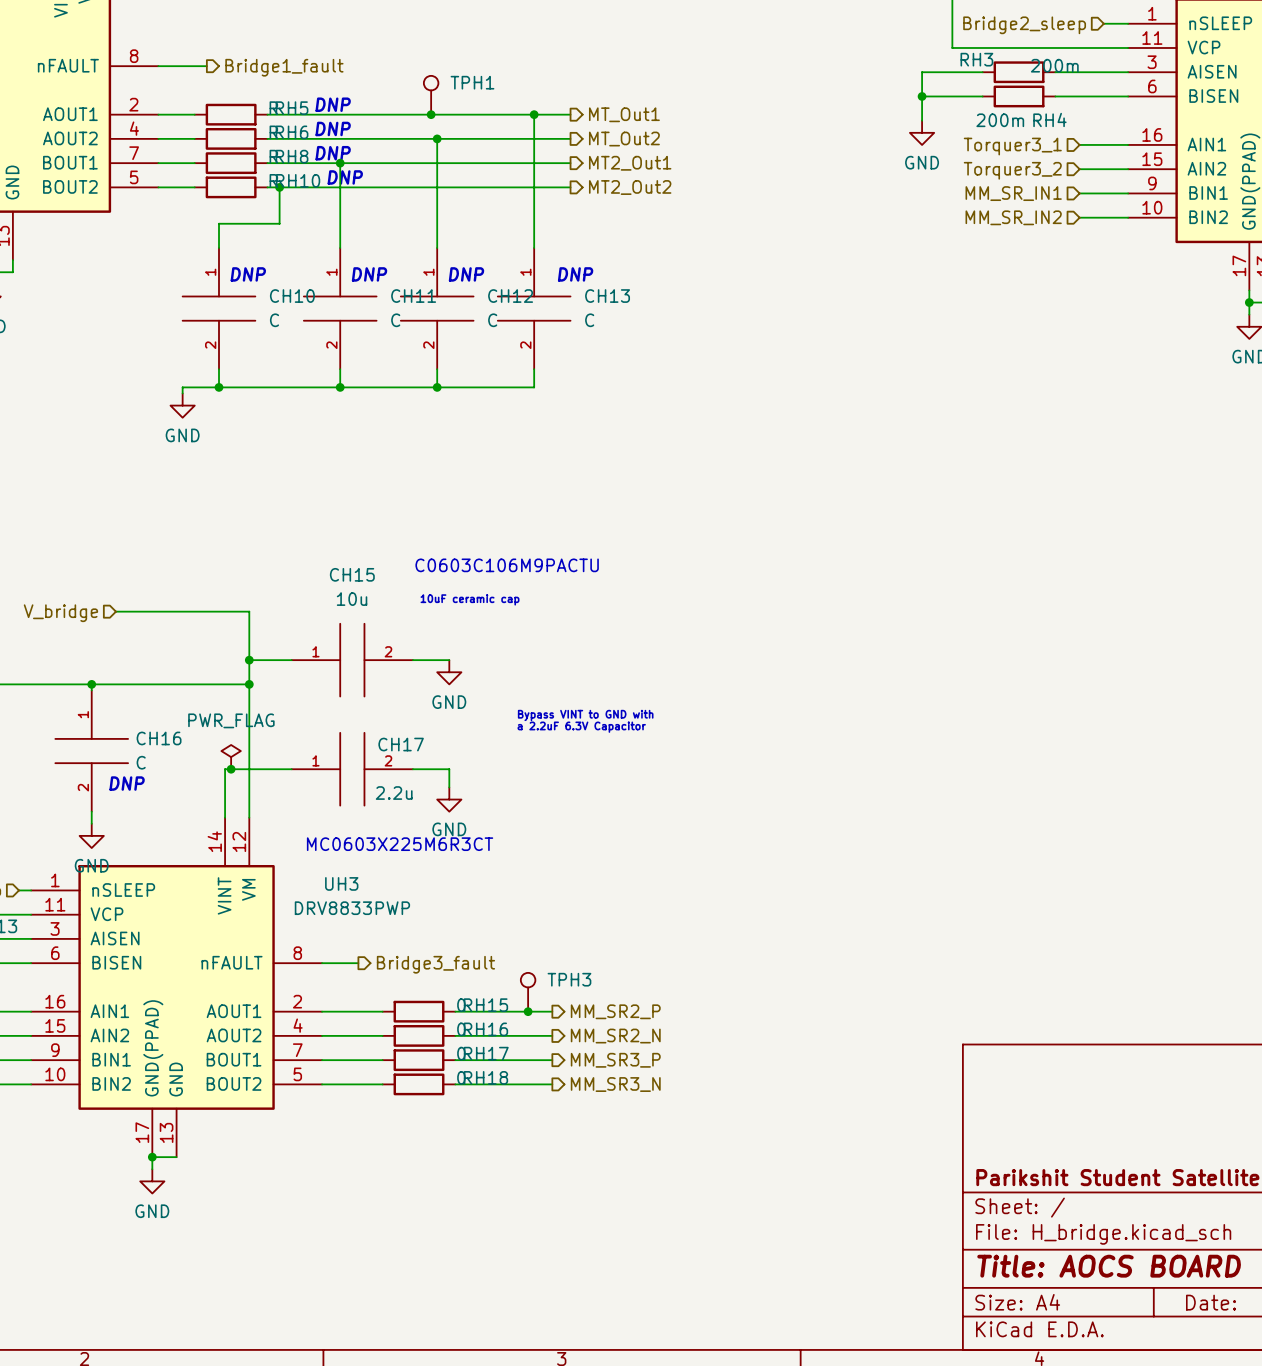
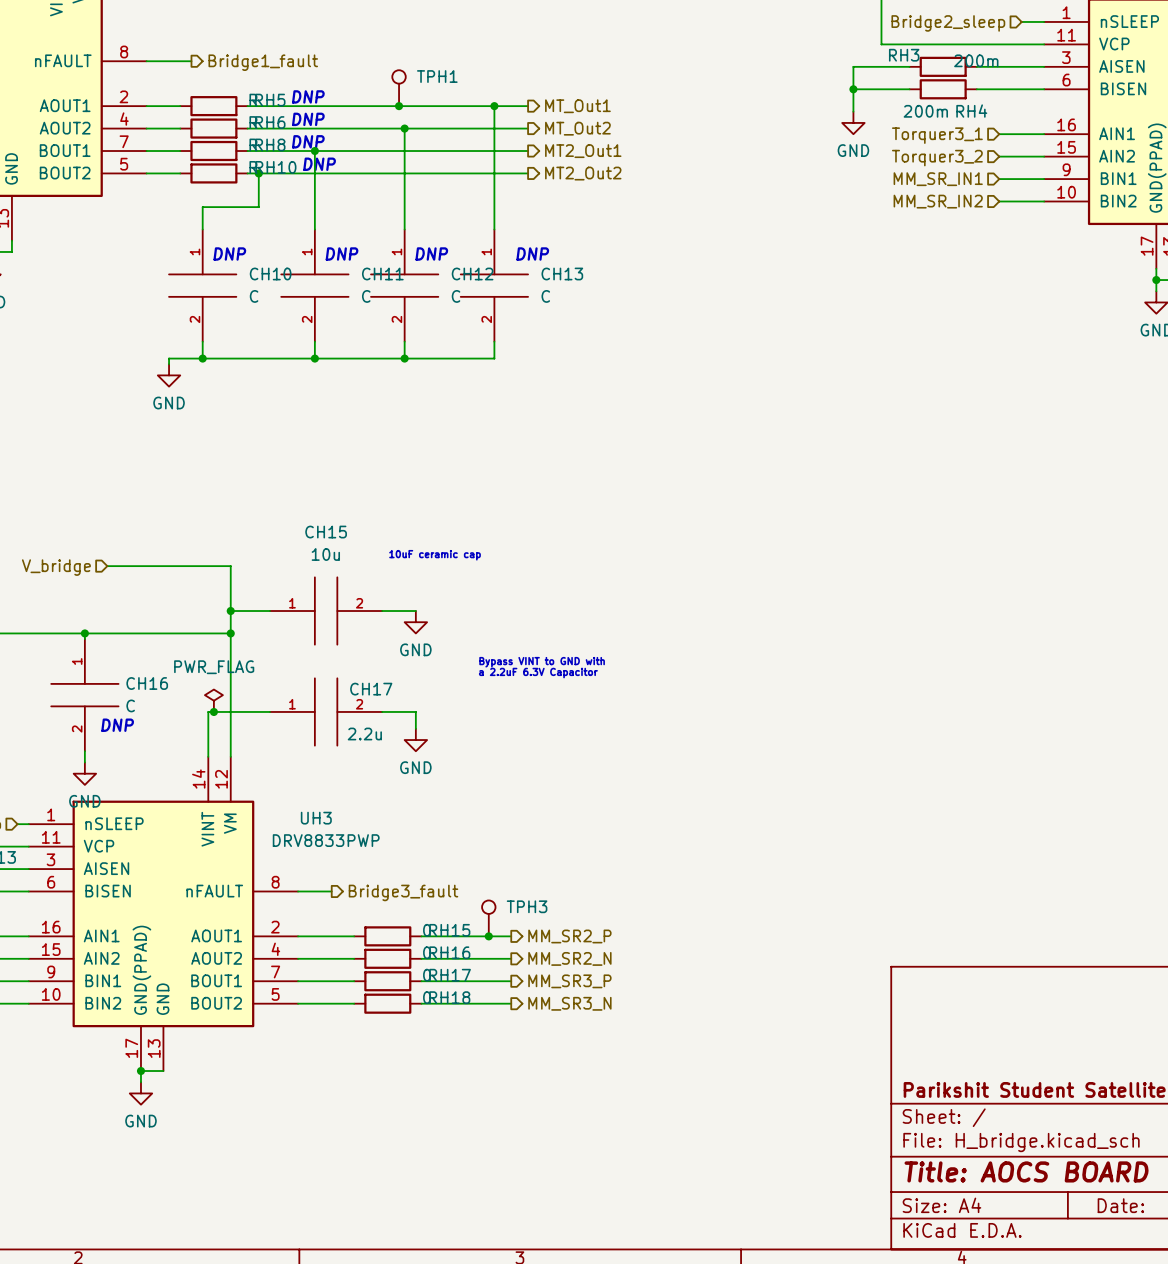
text: C0603C106M9PACTU (507, 565) -> none
text: MC0603X225M6R3CT (400, 844) -> none

